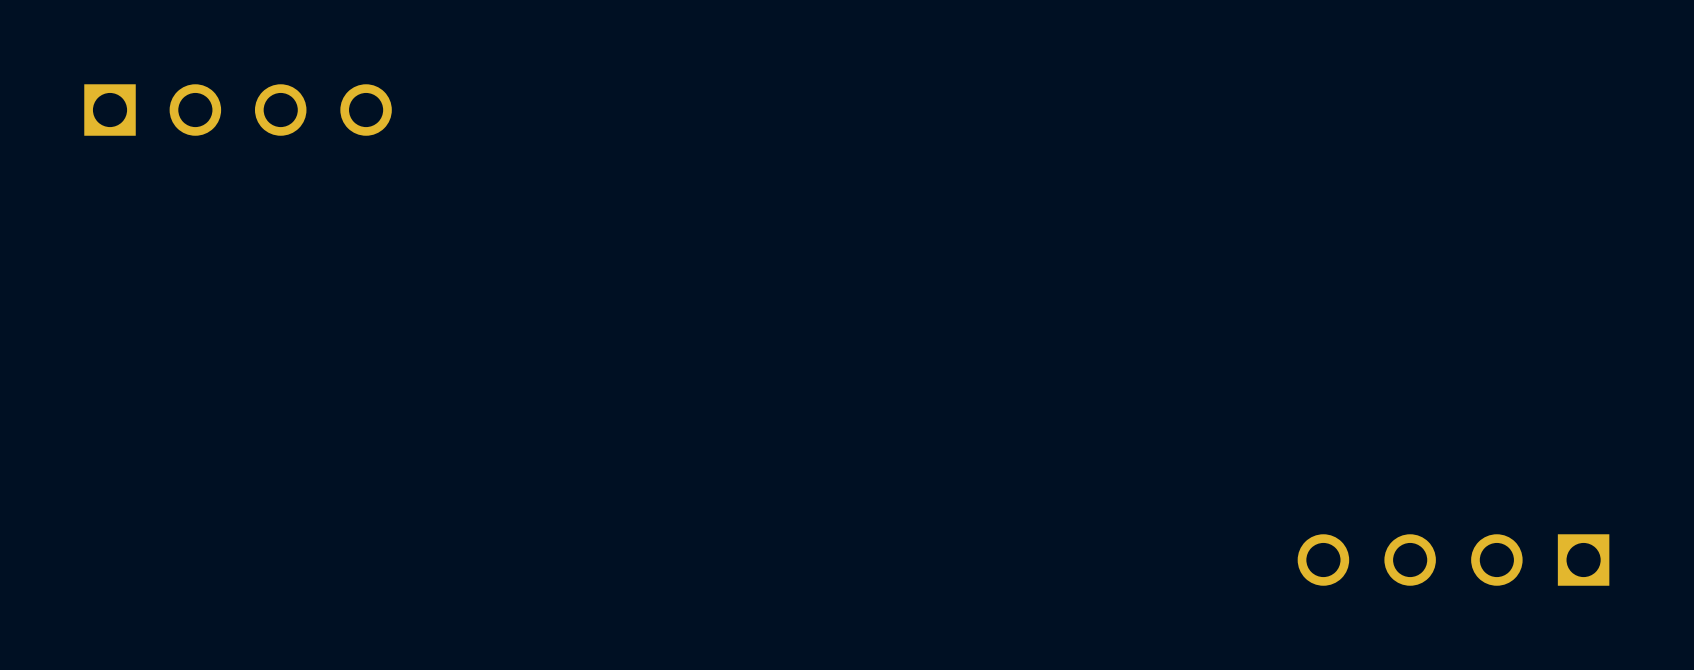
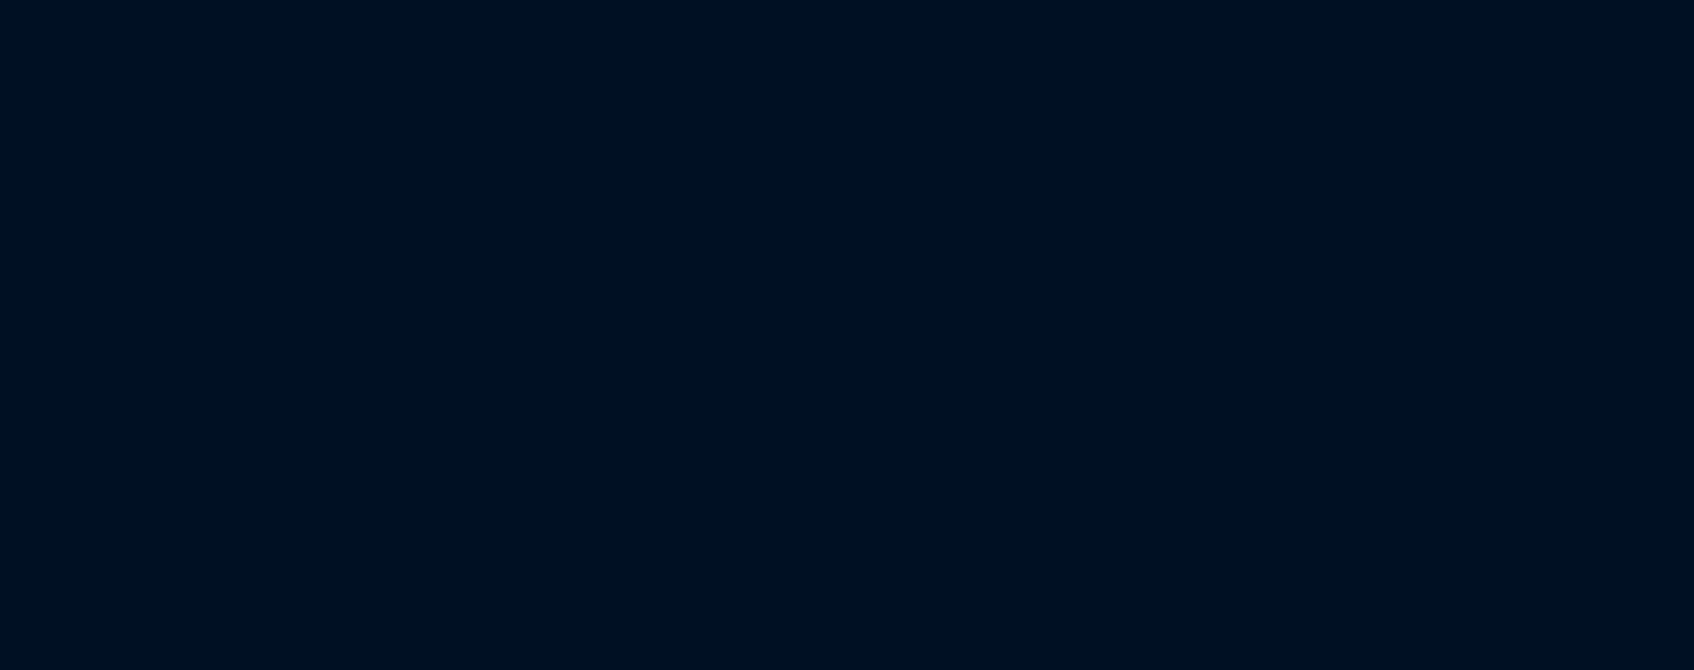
part: (238, 110) -> none
part: (1453, 560) -> none

